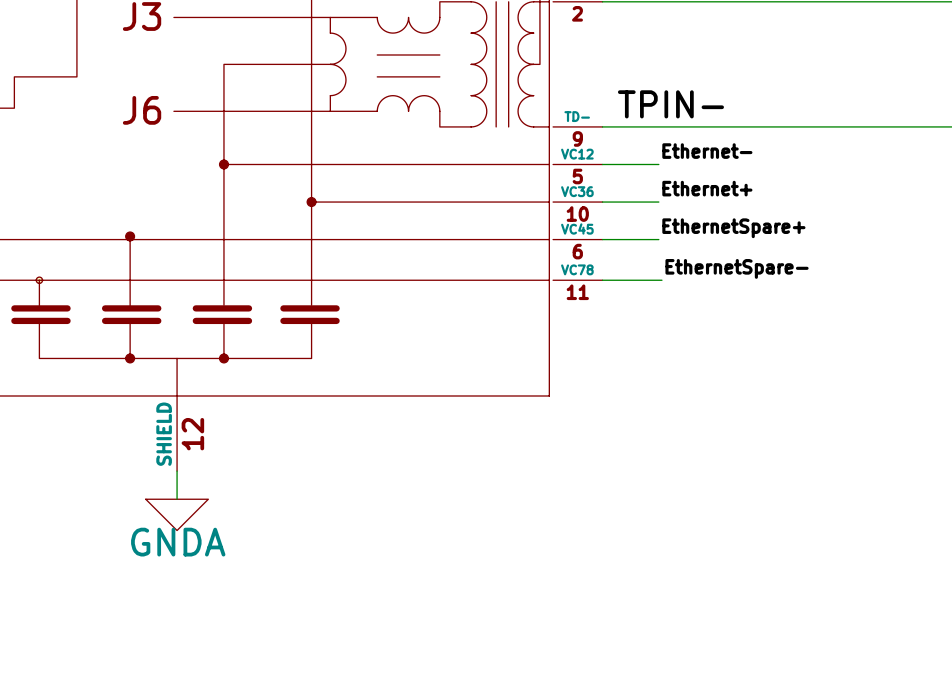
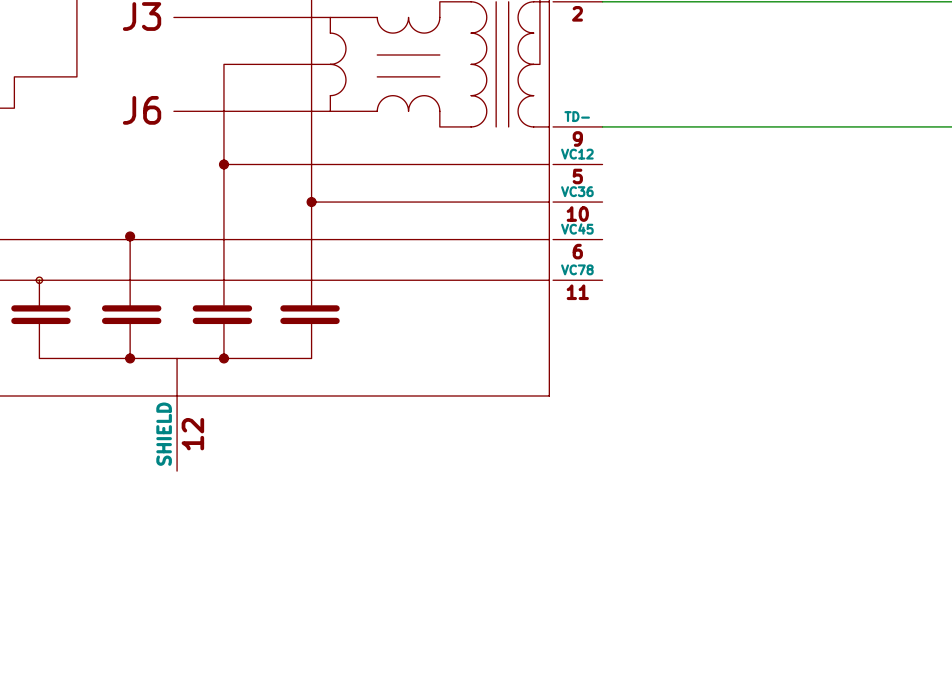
label: TPIN- (670, 104) -> none
label: Ethernet- (707, 151) -> none
wire: (602, 164) (658, 164) -> none
label: Ethernet+ (707, 188) -> none
wire: (602, 202) (658, 202) -> none
label: EthernetSpare+ (733, 228) -> none
wire: (602, 239) (658, 239) -> none
label: EthernetSpare- (737, 268) -> none
wire: (602, 280) (661, 280) -> none
wire: (177, 471) (177, 499) -> none
power symbol: GNDA (177, 514) -> none

